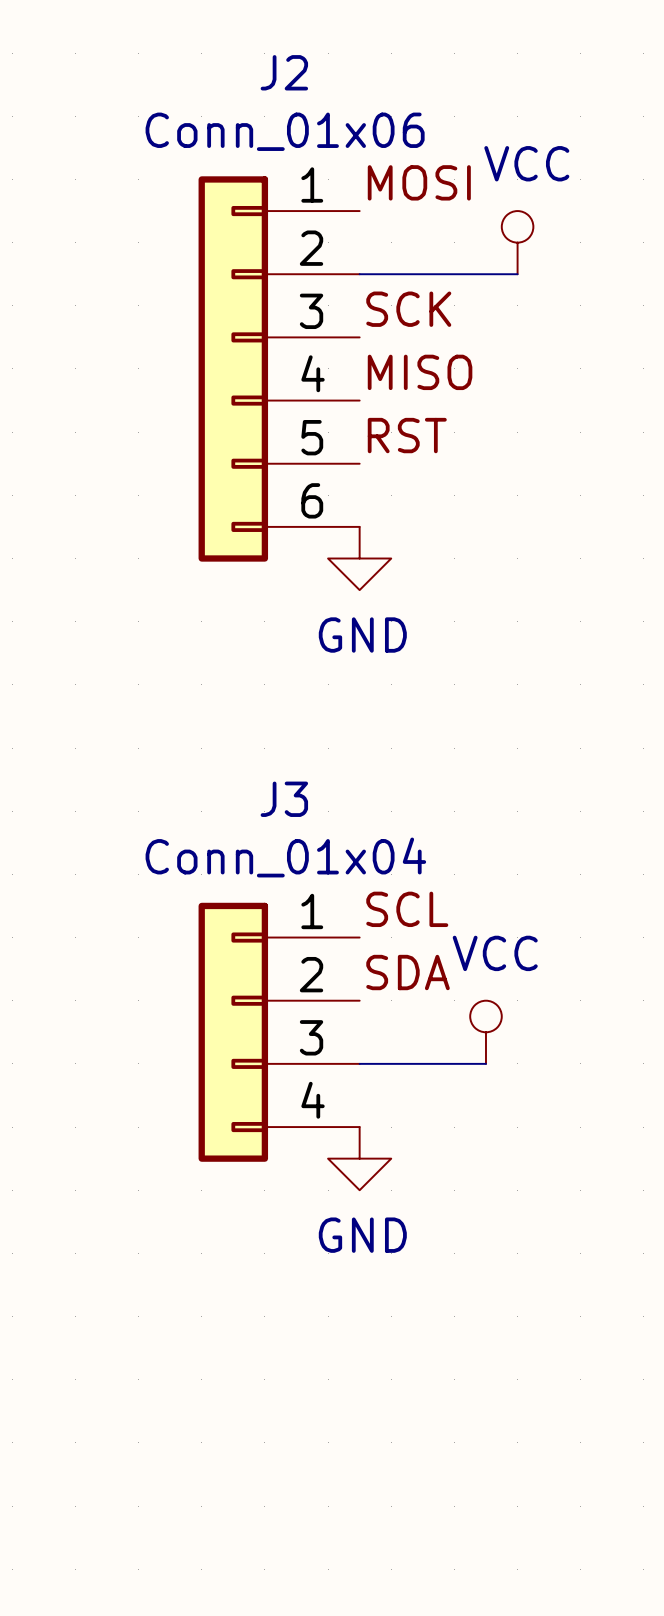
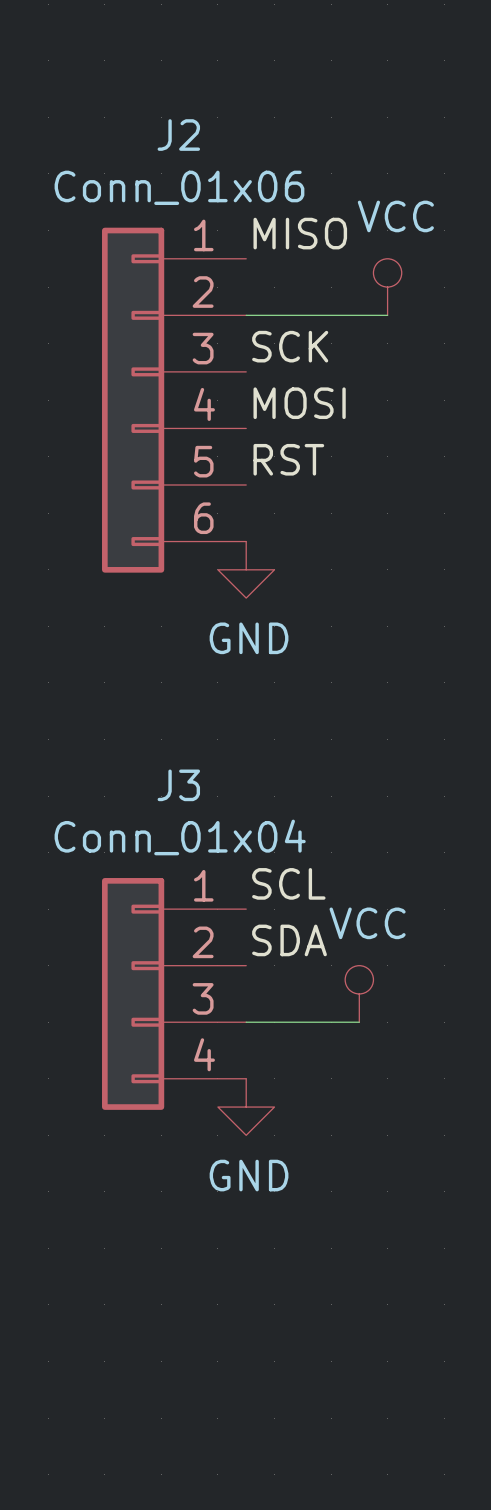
label: MOSI (419, 182) -> MISO (300, 233)
label: MISO (420, 372) -> MOSI (299, 403)

